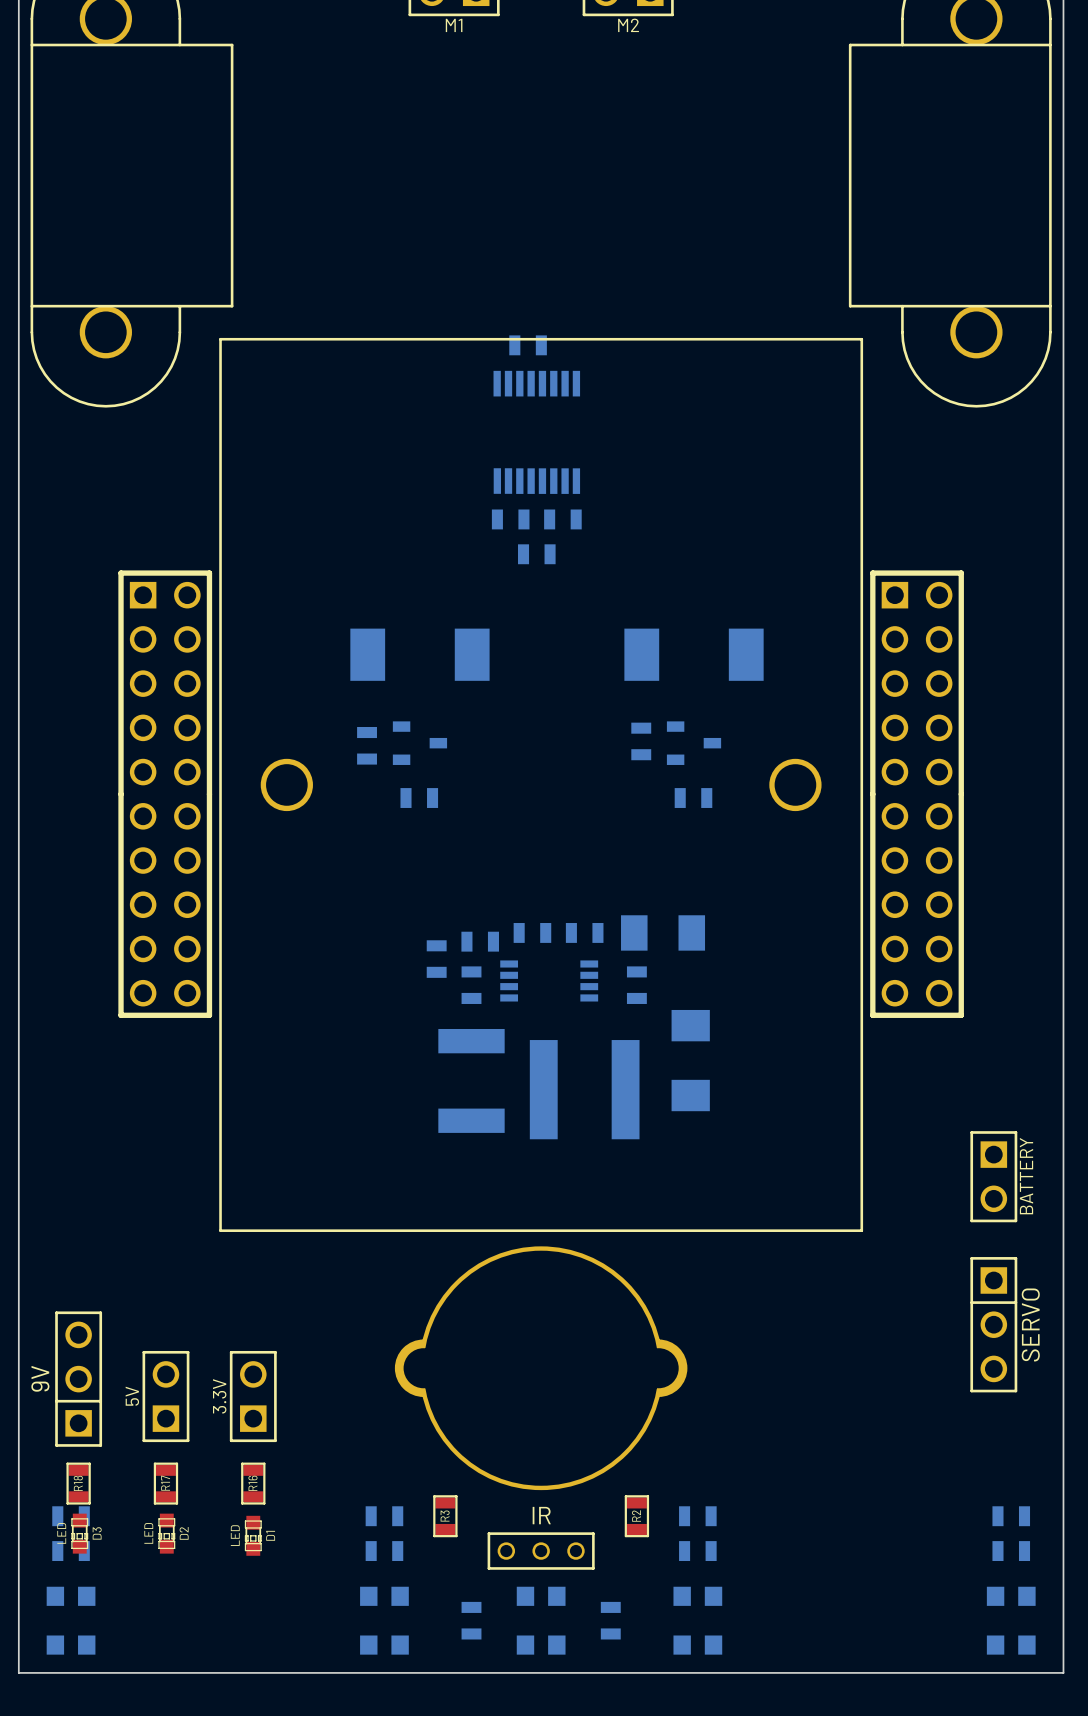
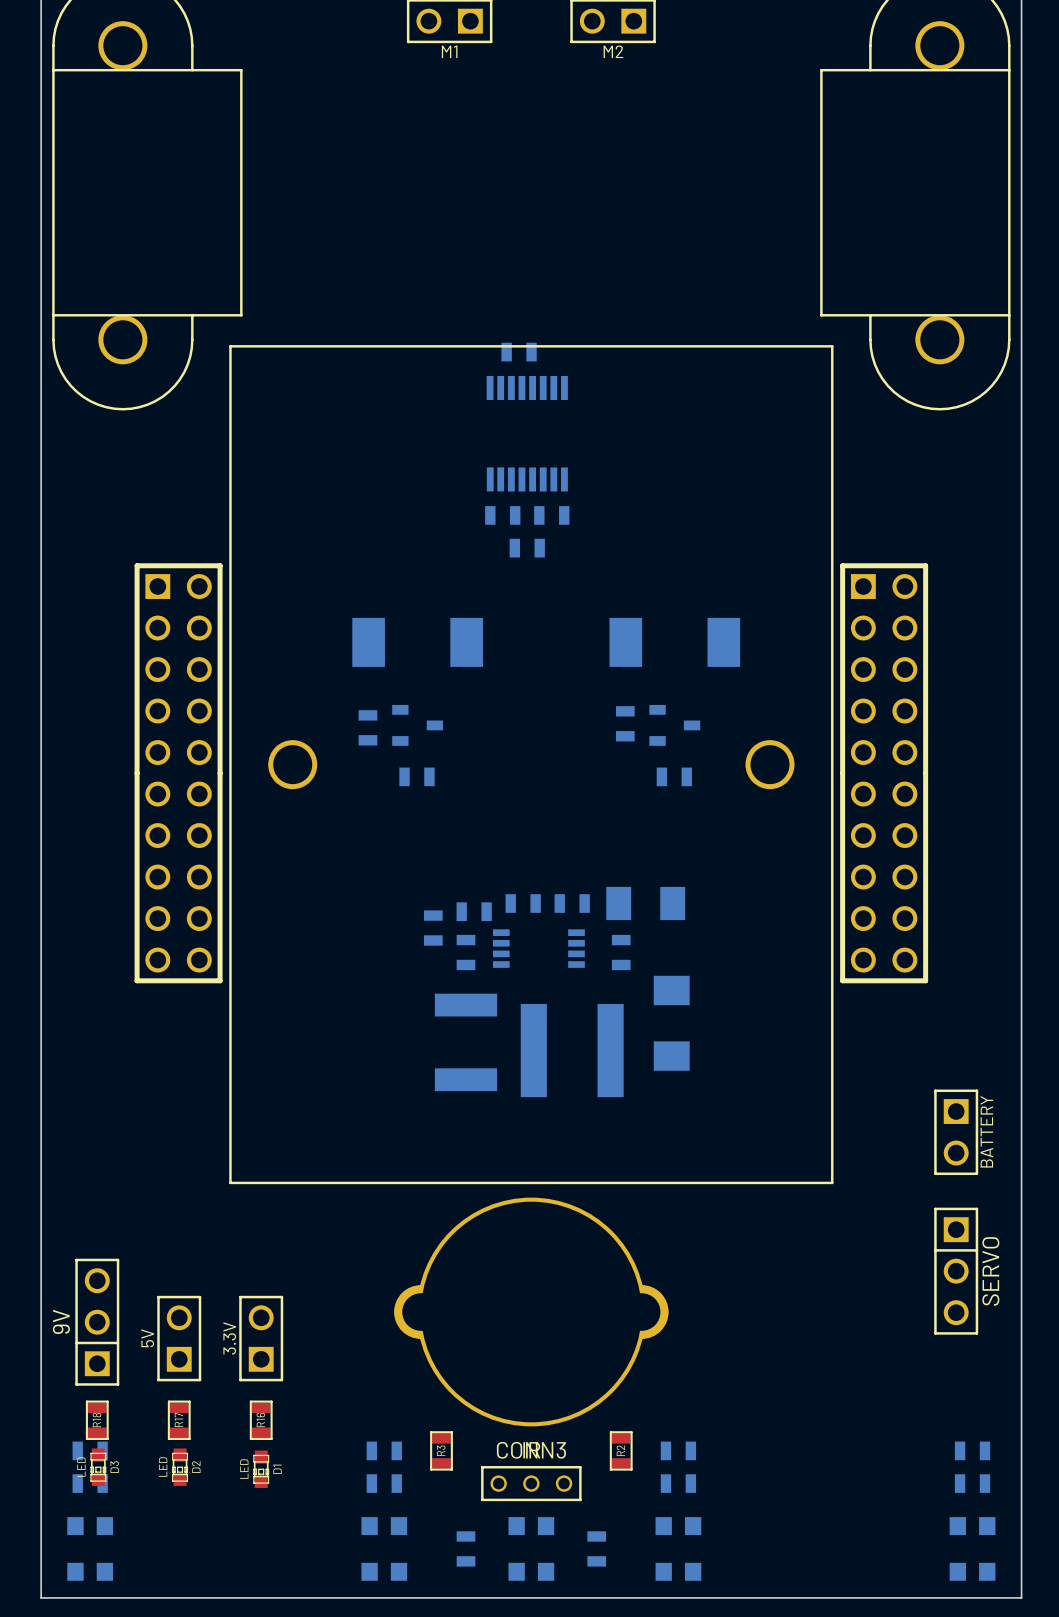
CONN3 name: none -> CONN3 (531, 1450)

